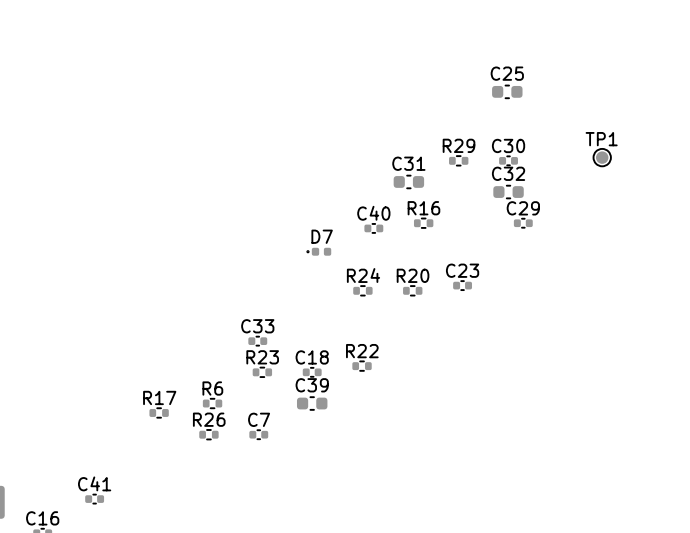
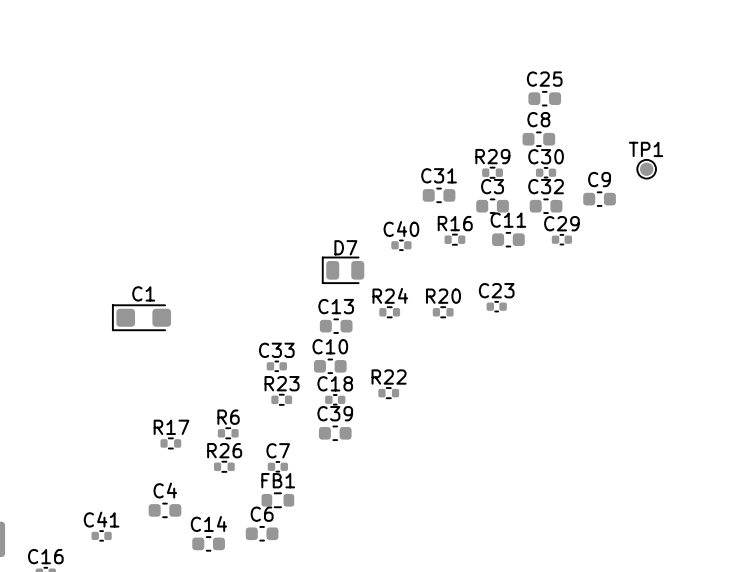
C8: none -> (538, 139)
C9: none -> (599, 199)
C3: none -> (492, 206)
C11: none -> (508, 239)
D7 footprint: [306, 247, 332, 256] -> [321, 256, 365, 284]
C1: none -> (141, 317)
C13: none -> (336, 326)
C10: none -> (330, 366)
FB1: none -> (277, 500)
C4: none -> (164, 510)
C6: none -> (262, 533)
C14: none -> (208, 543)

